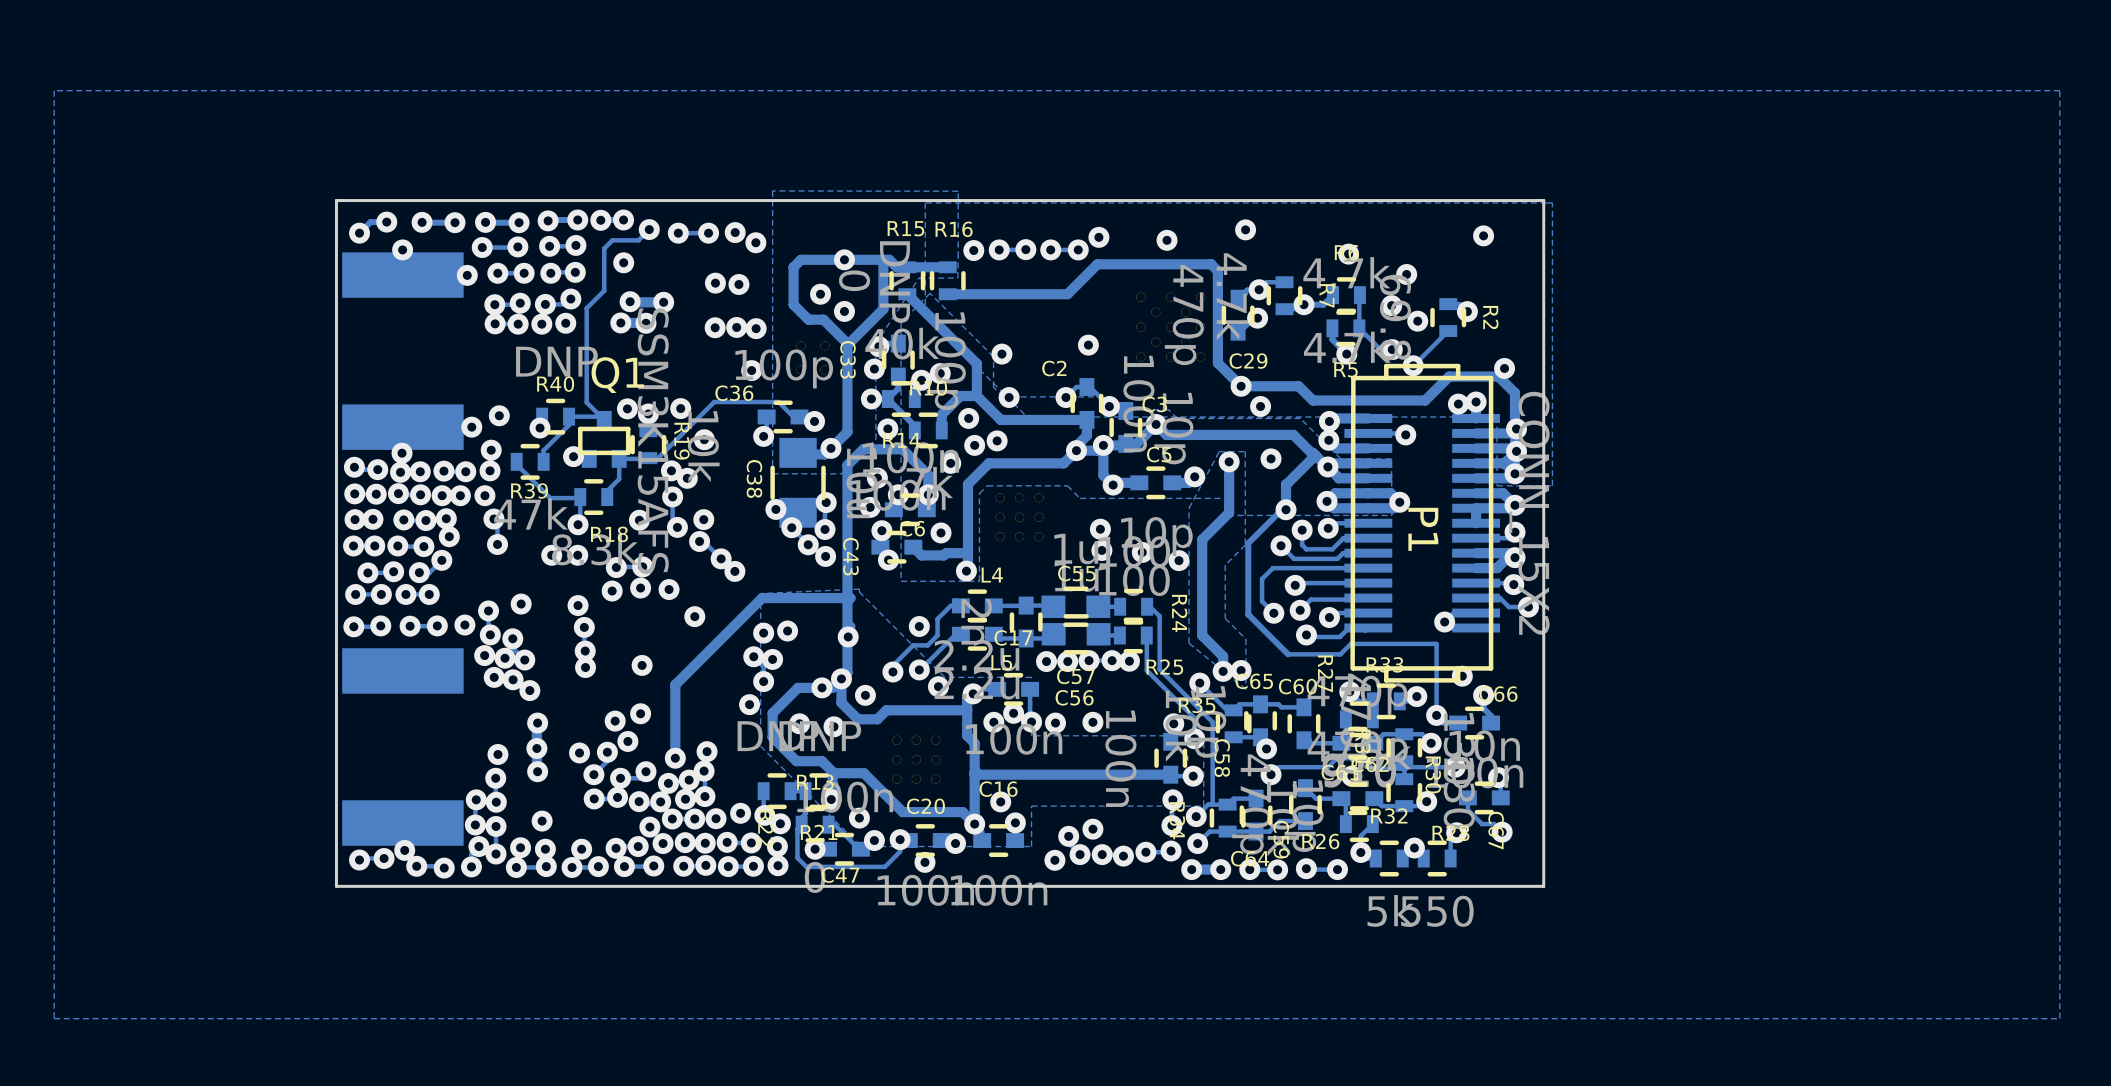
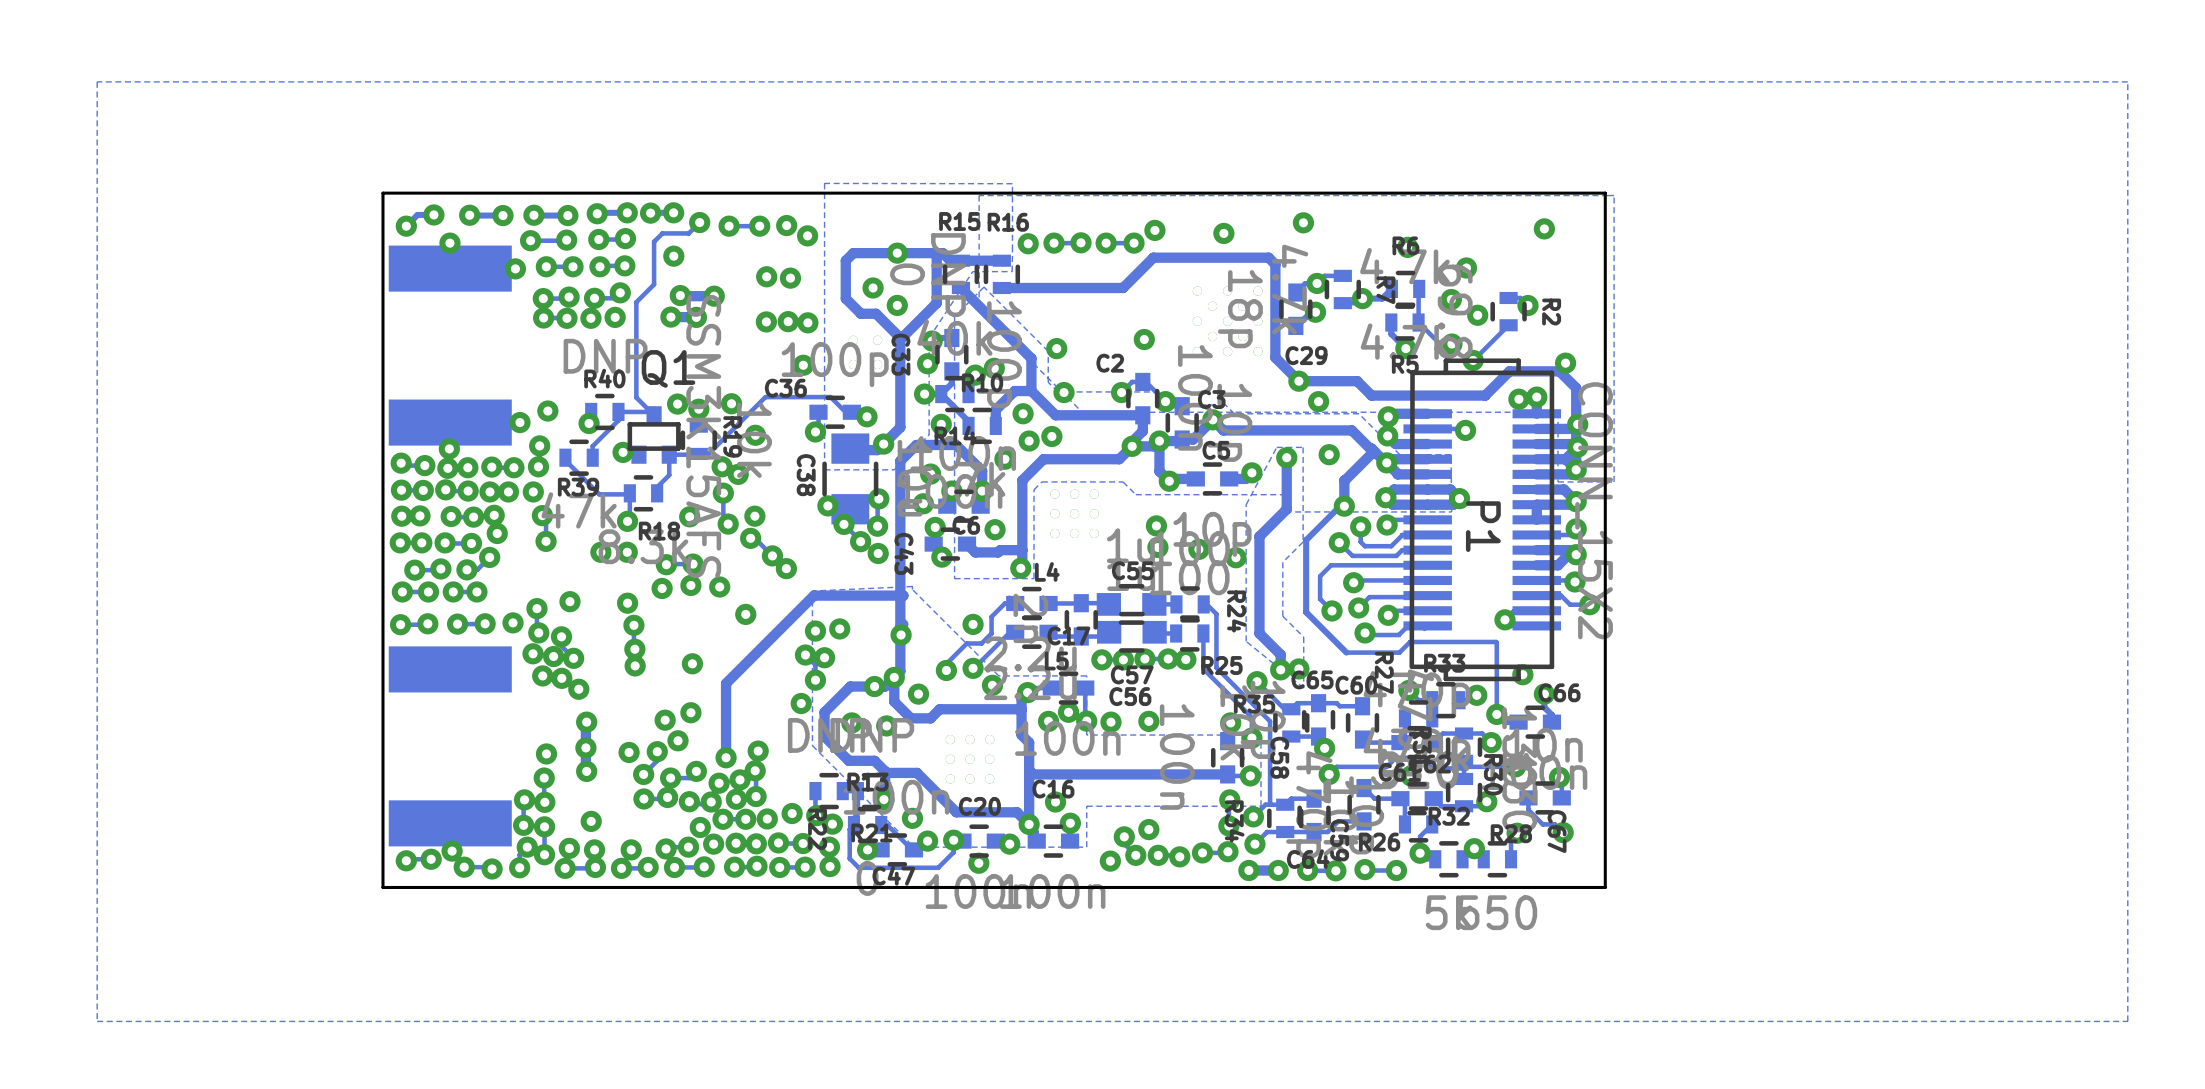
C29 value: 470p (1184, 315) -> 18p (1240, 309)

